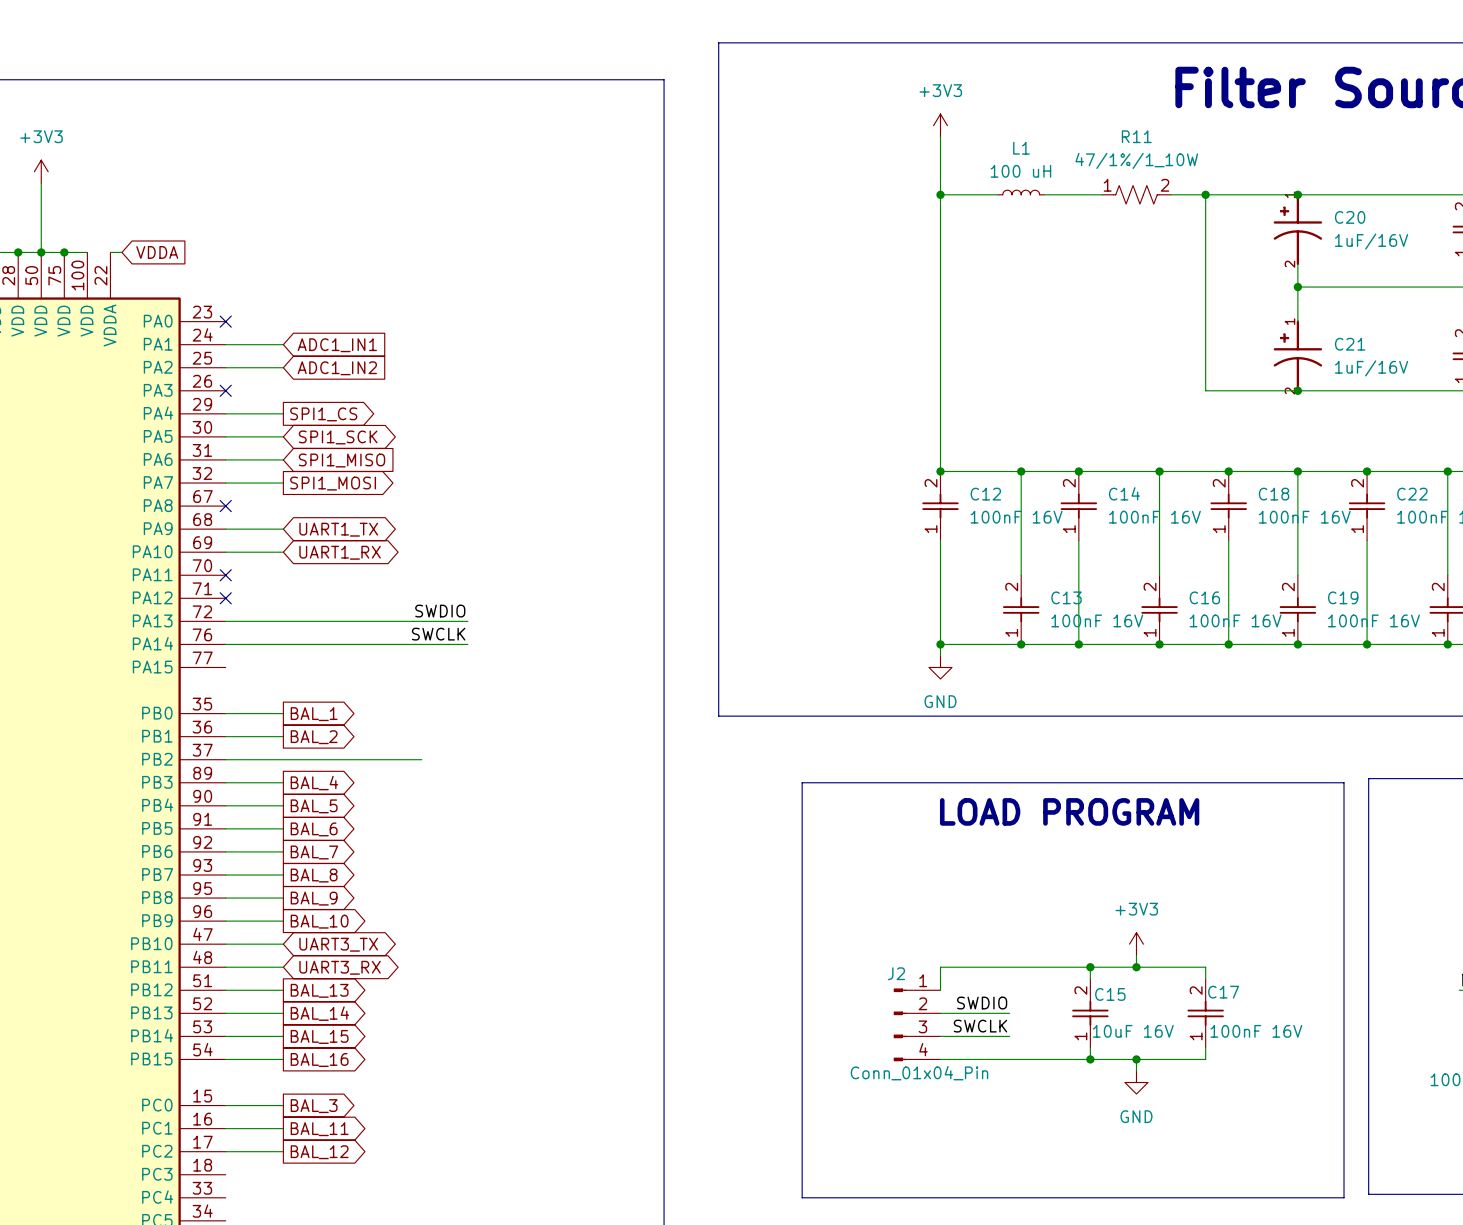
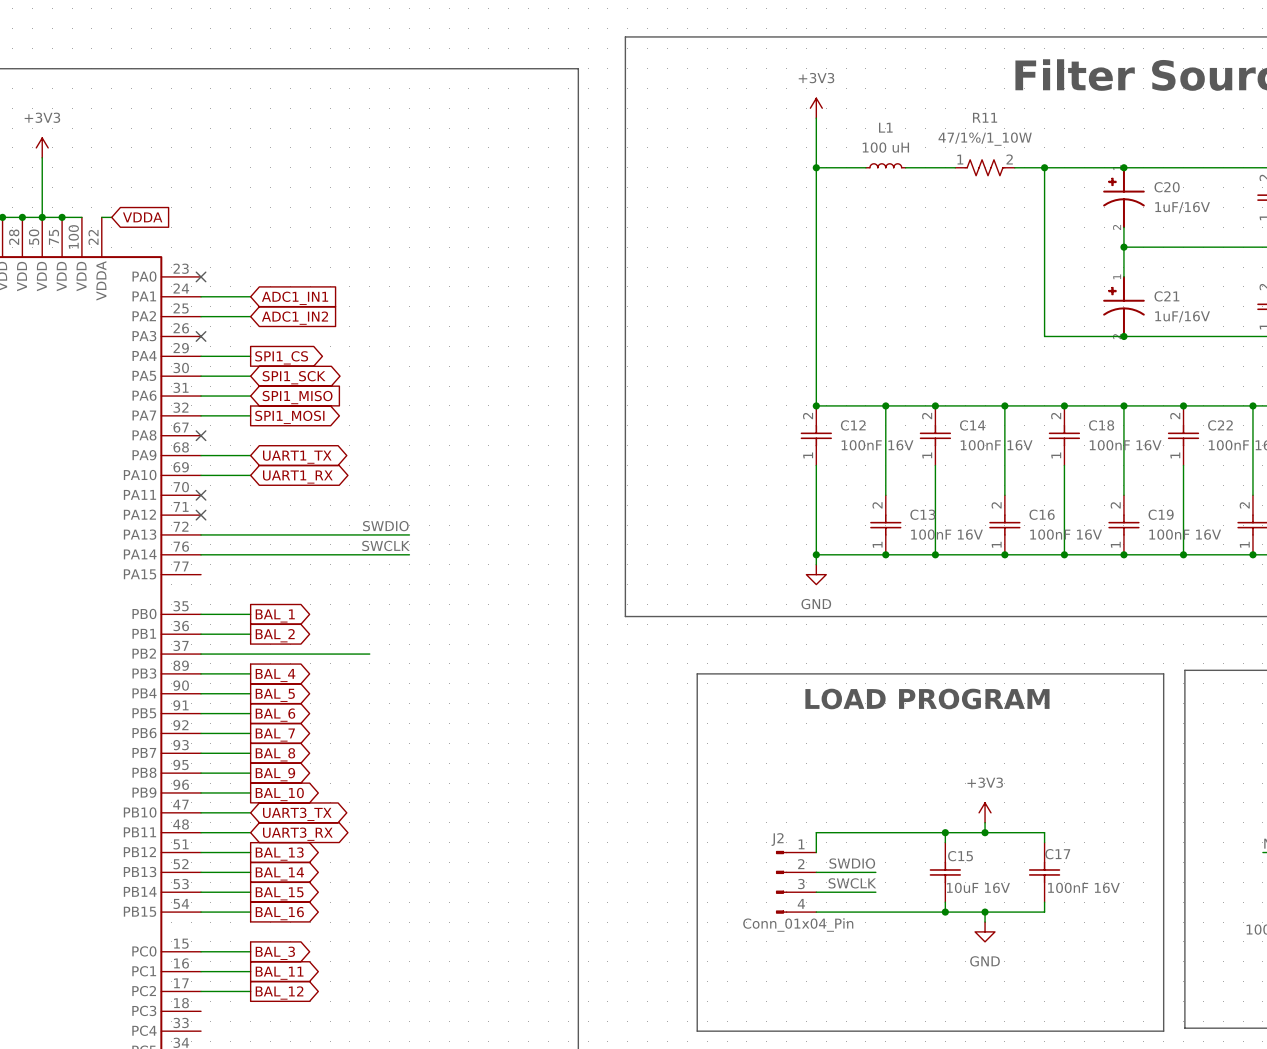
C15 pin number: 2 (1080, 990) -> none
C17 pin number: 2 (1196, 990) -> none
C15 pin number: 1 (1080, 1036) -> none
C17 pin number: 1 (1196, 1036) -> none

